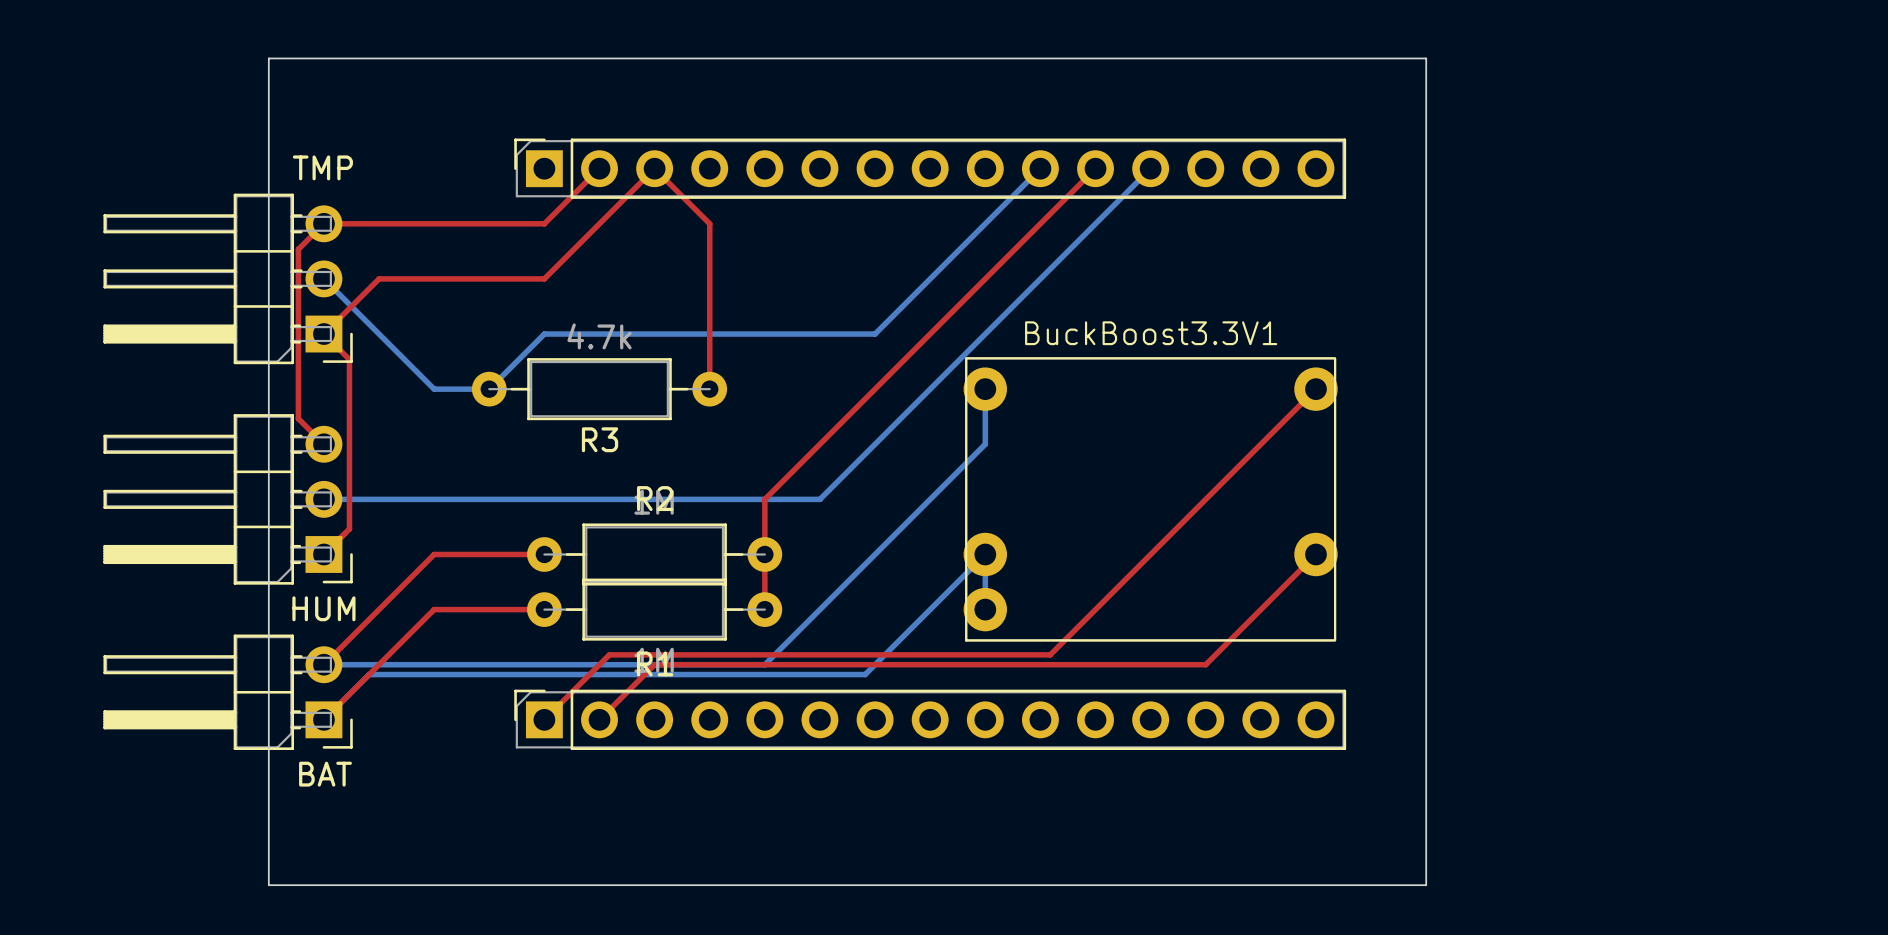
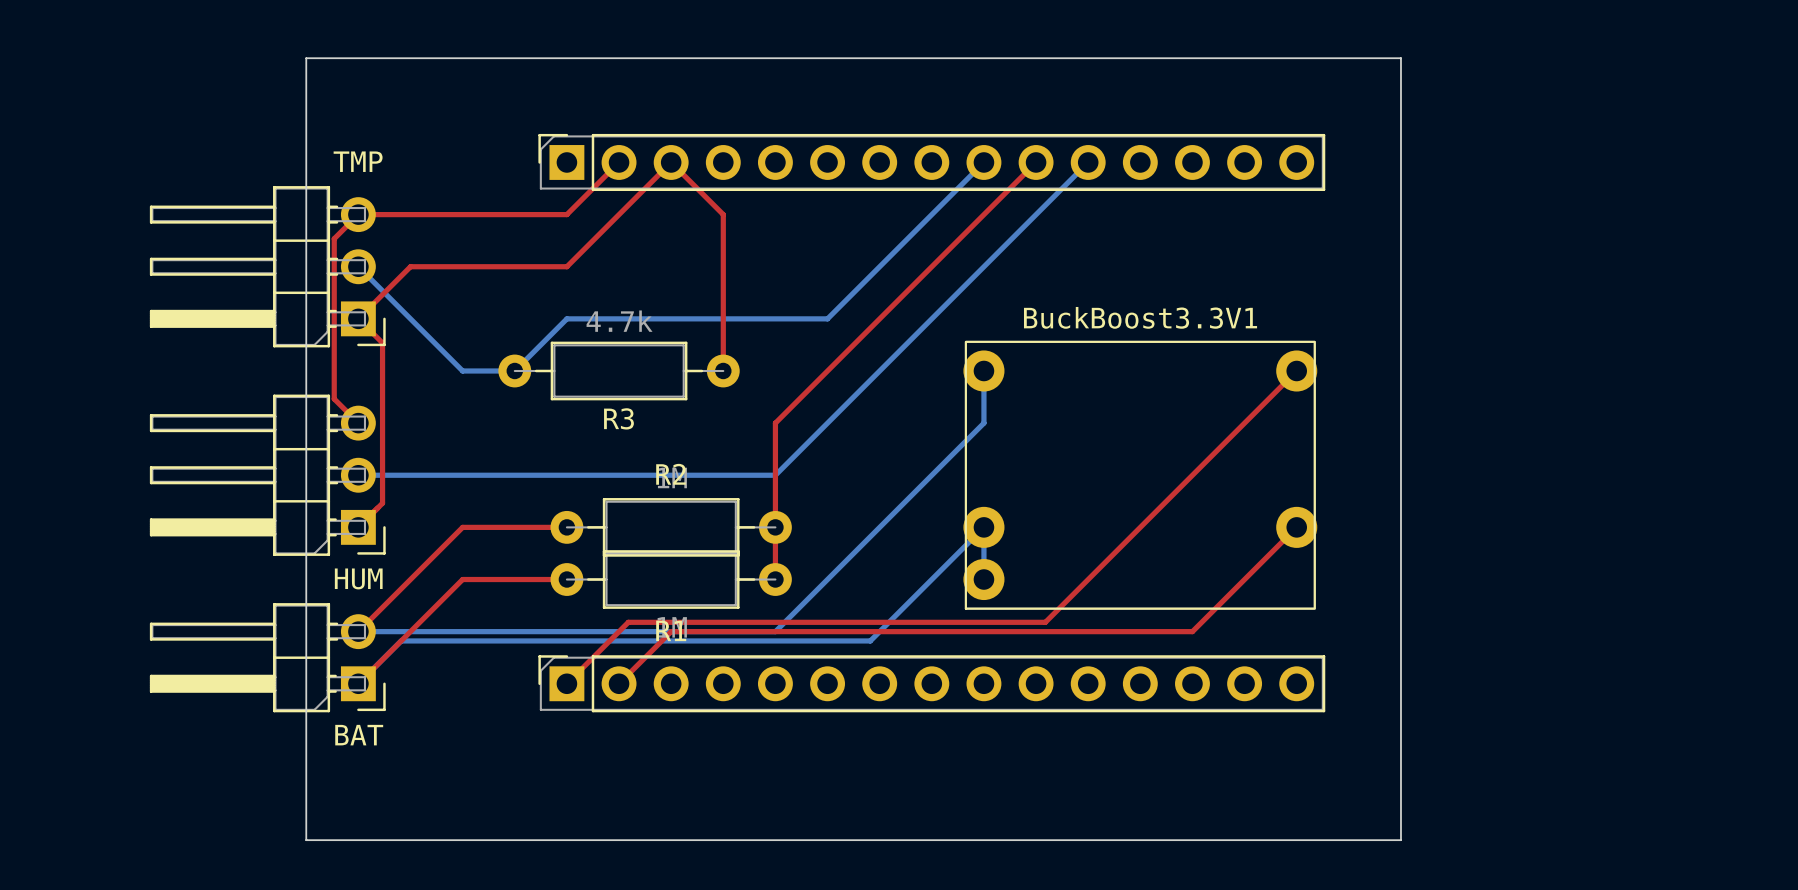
bottom track: (1040, 168) (875, 334) (819, 334) -> (983, 162) (827, 318)
top track: (1095, 168) (764, 499) -> (1036, 162) (775, 423) (775, 475)
bottom track: (1150, 168) (819, 499) (764, 499) -> (1088, 162) (775, 475)

